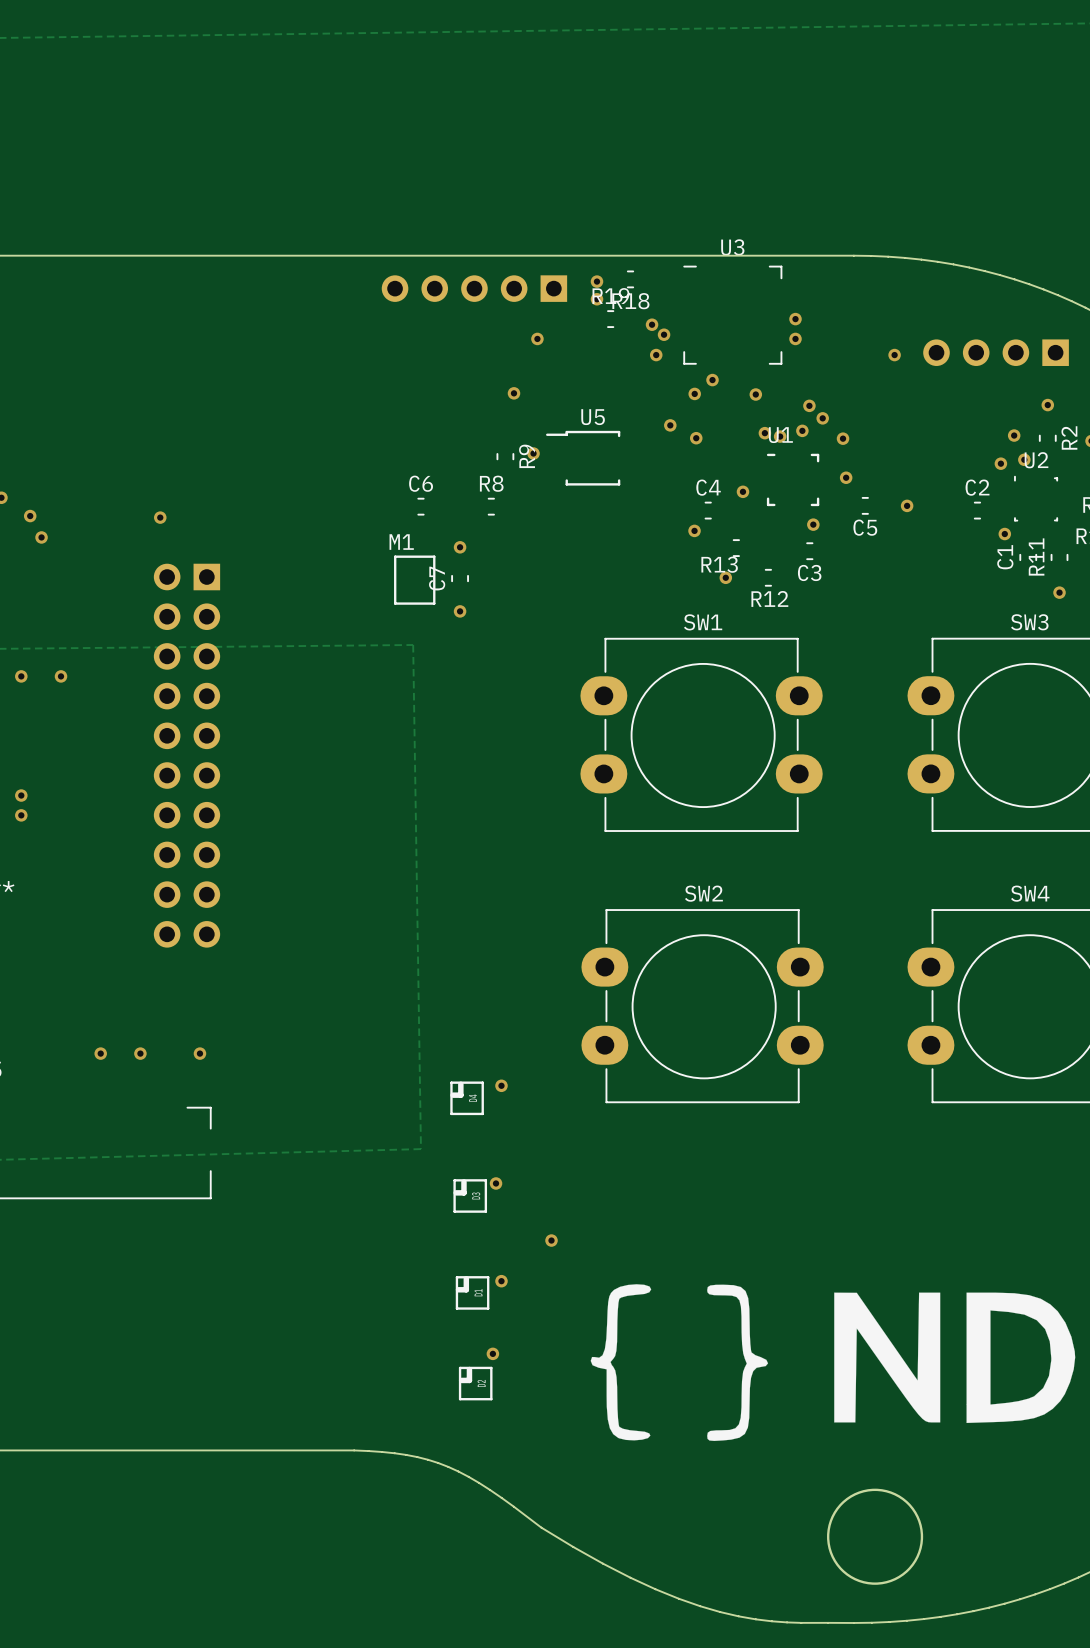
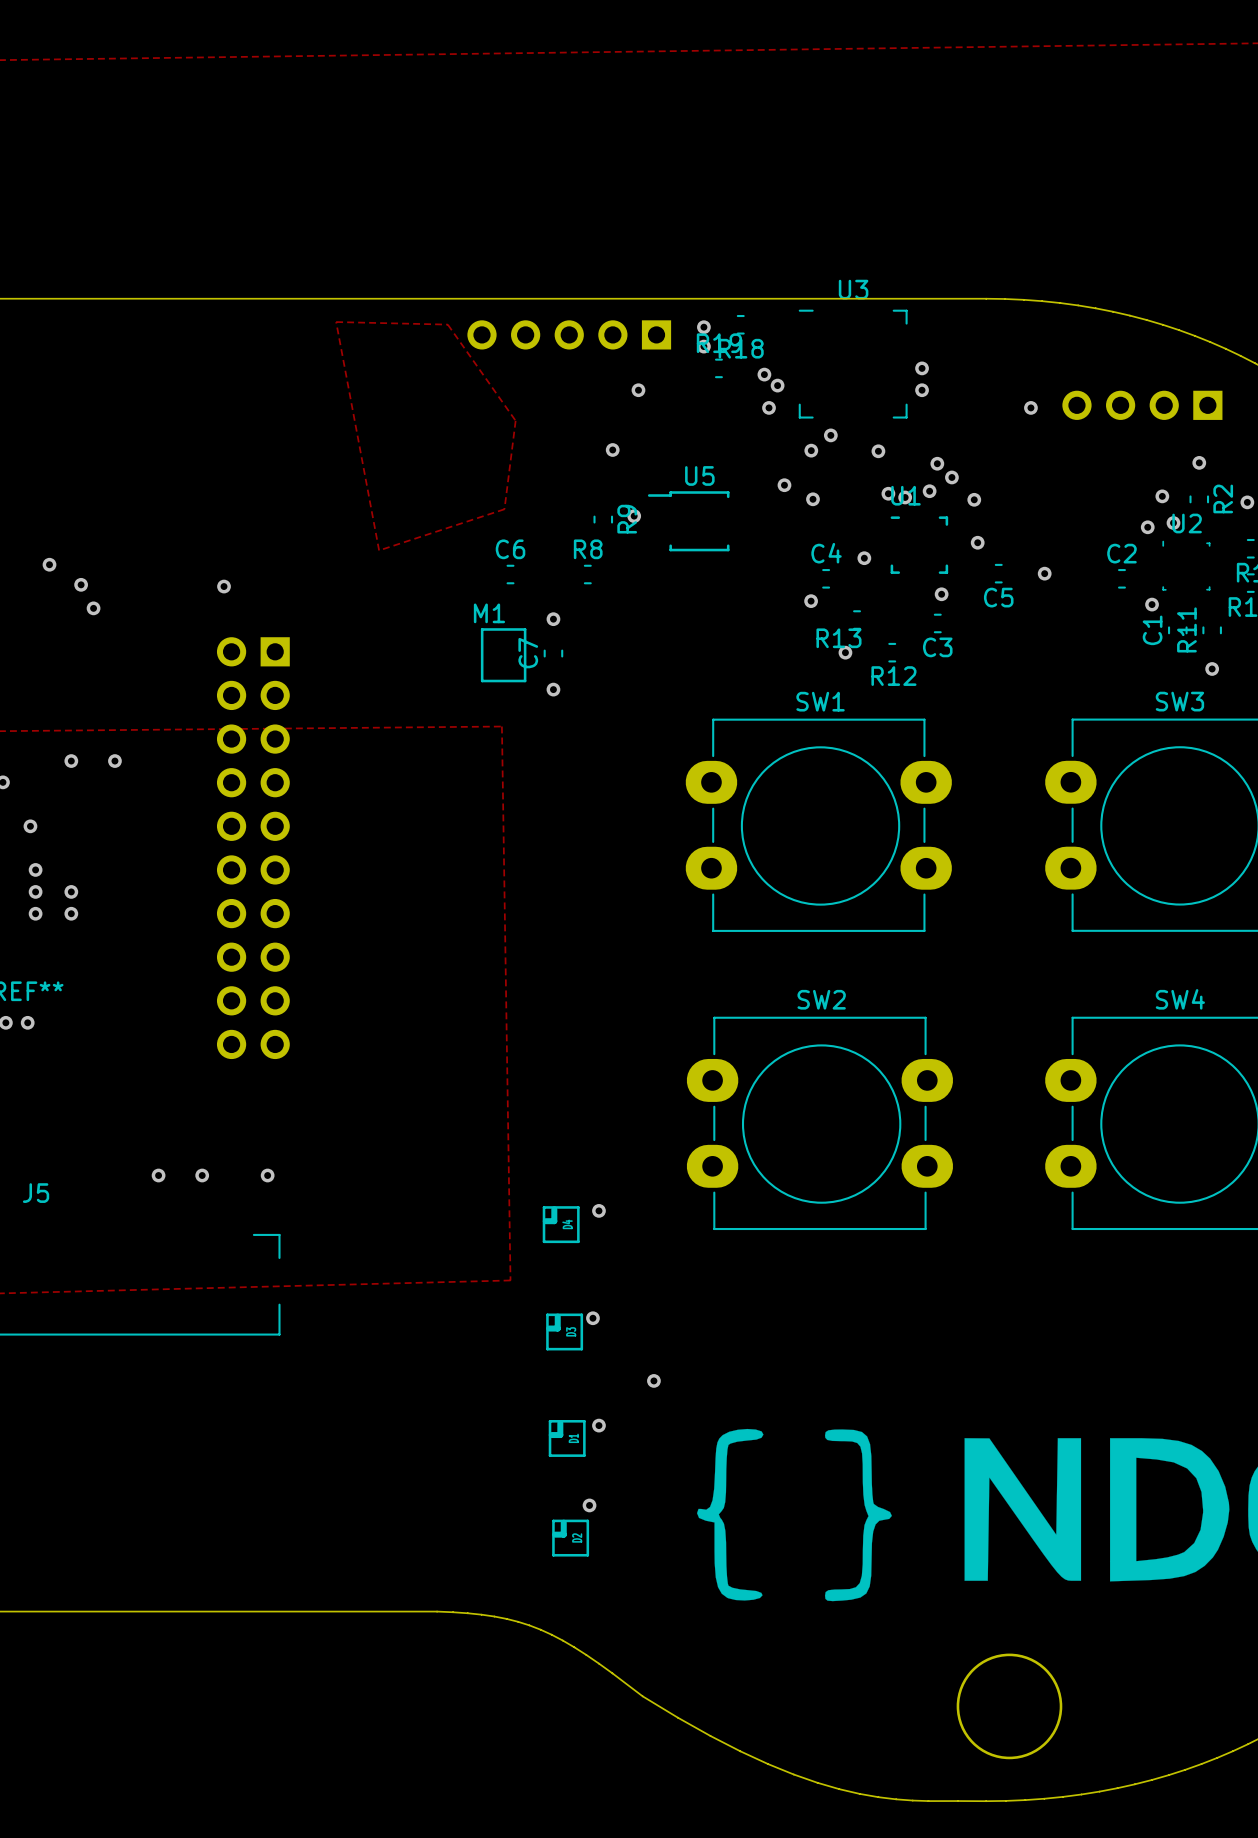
zone outline: none -> (336, 322) (447, 324) (515, 420) (504, 509) (379, 550) (336, 322)

